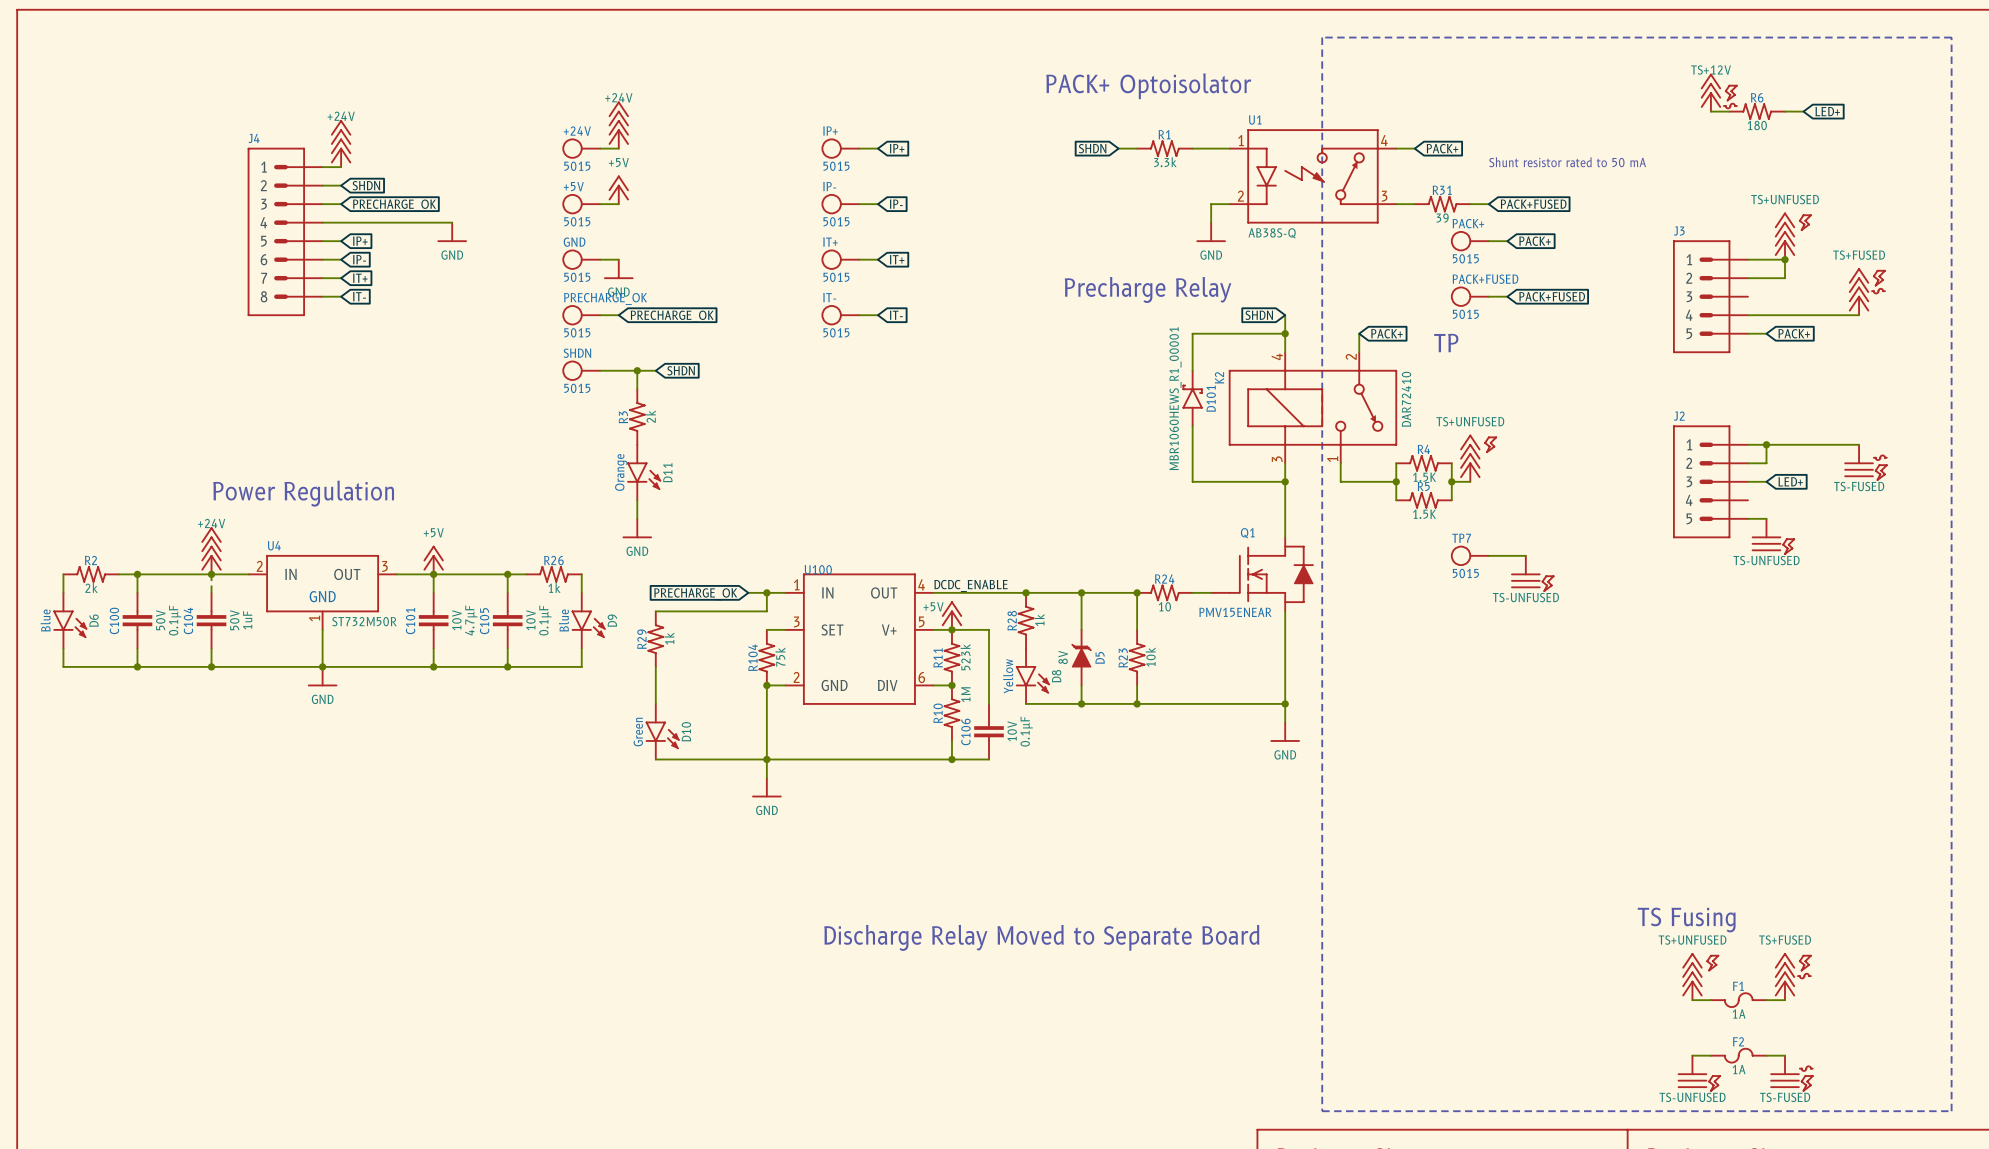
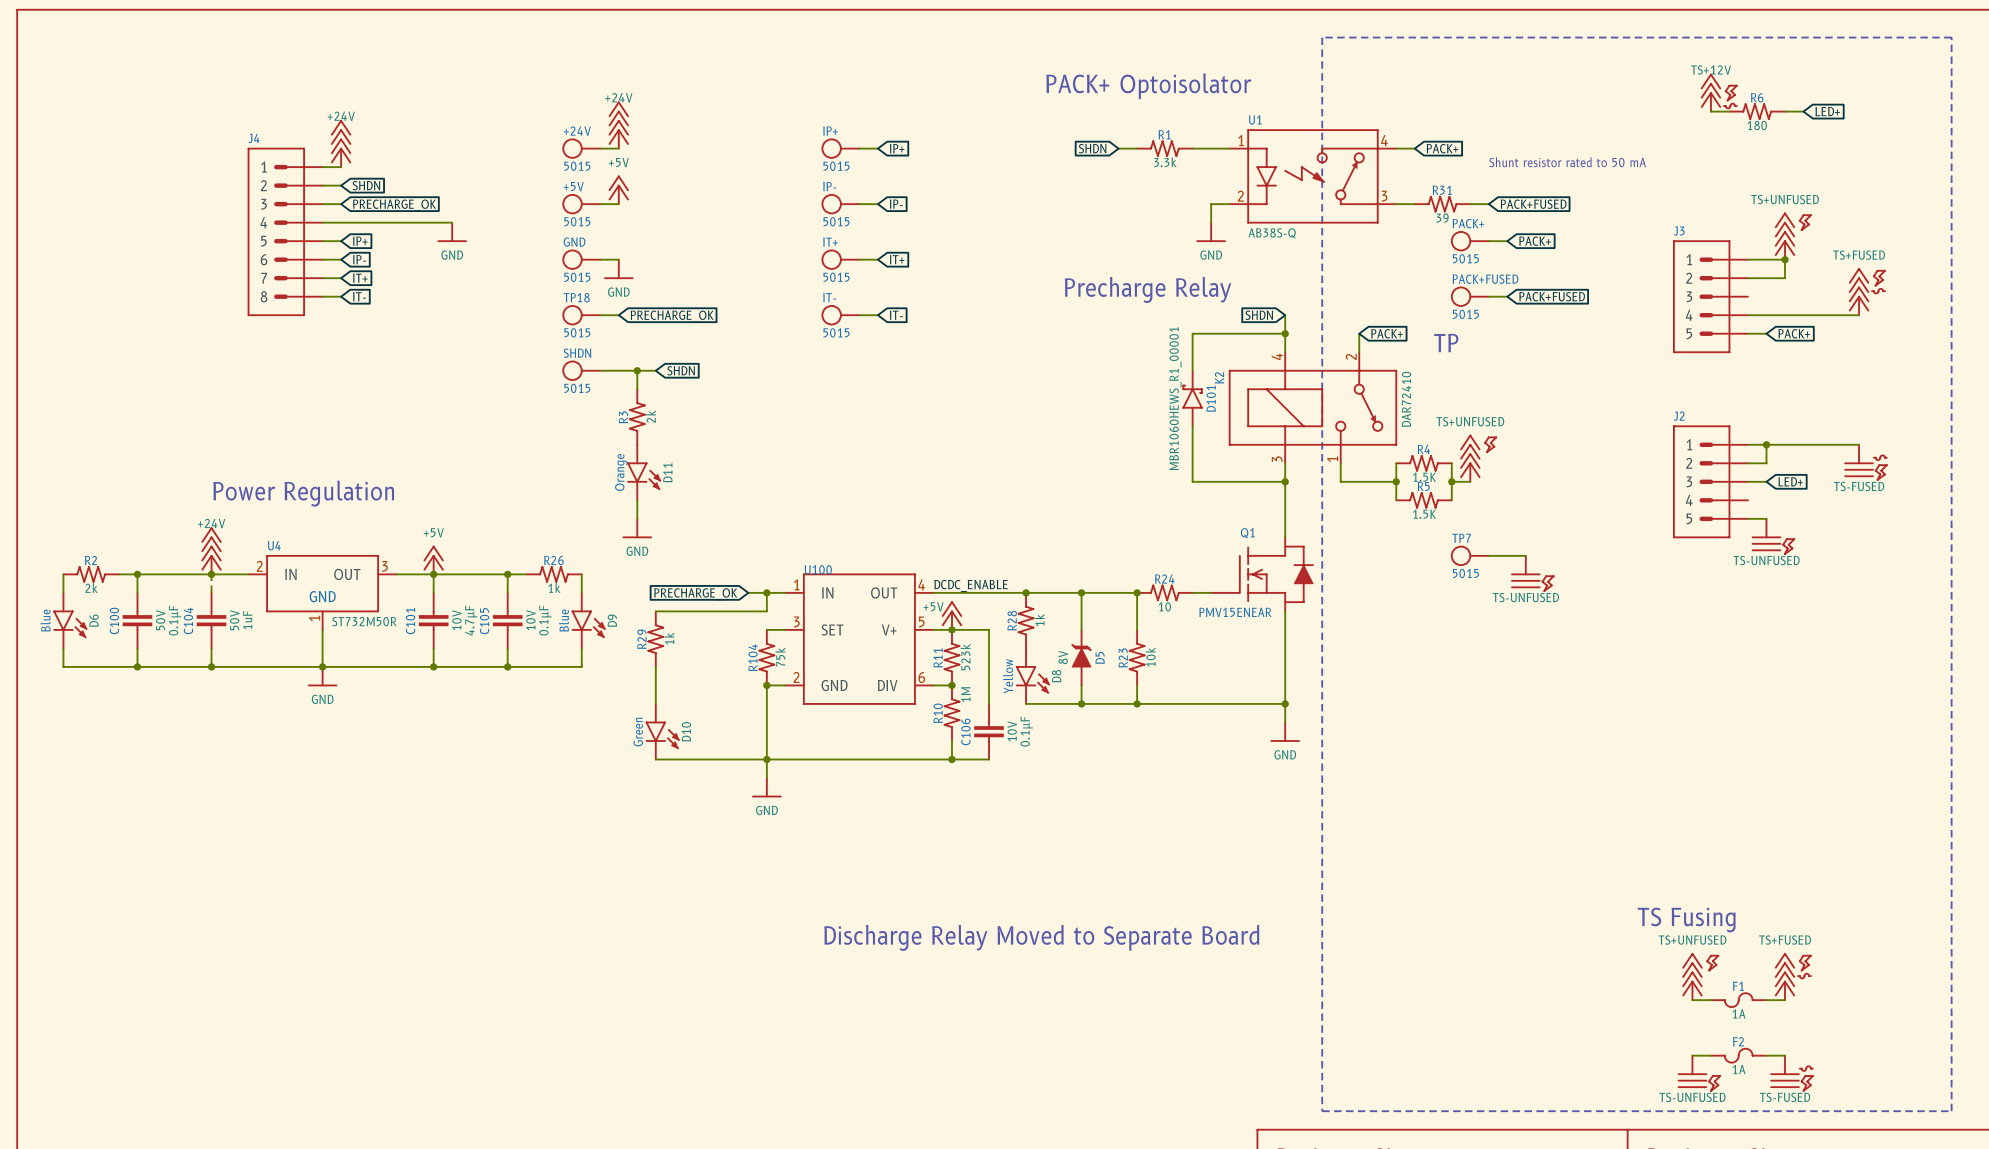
PRECHARGE_OK name: PRECHARGE_OK (605, 299) -> TP18 (576, 297)

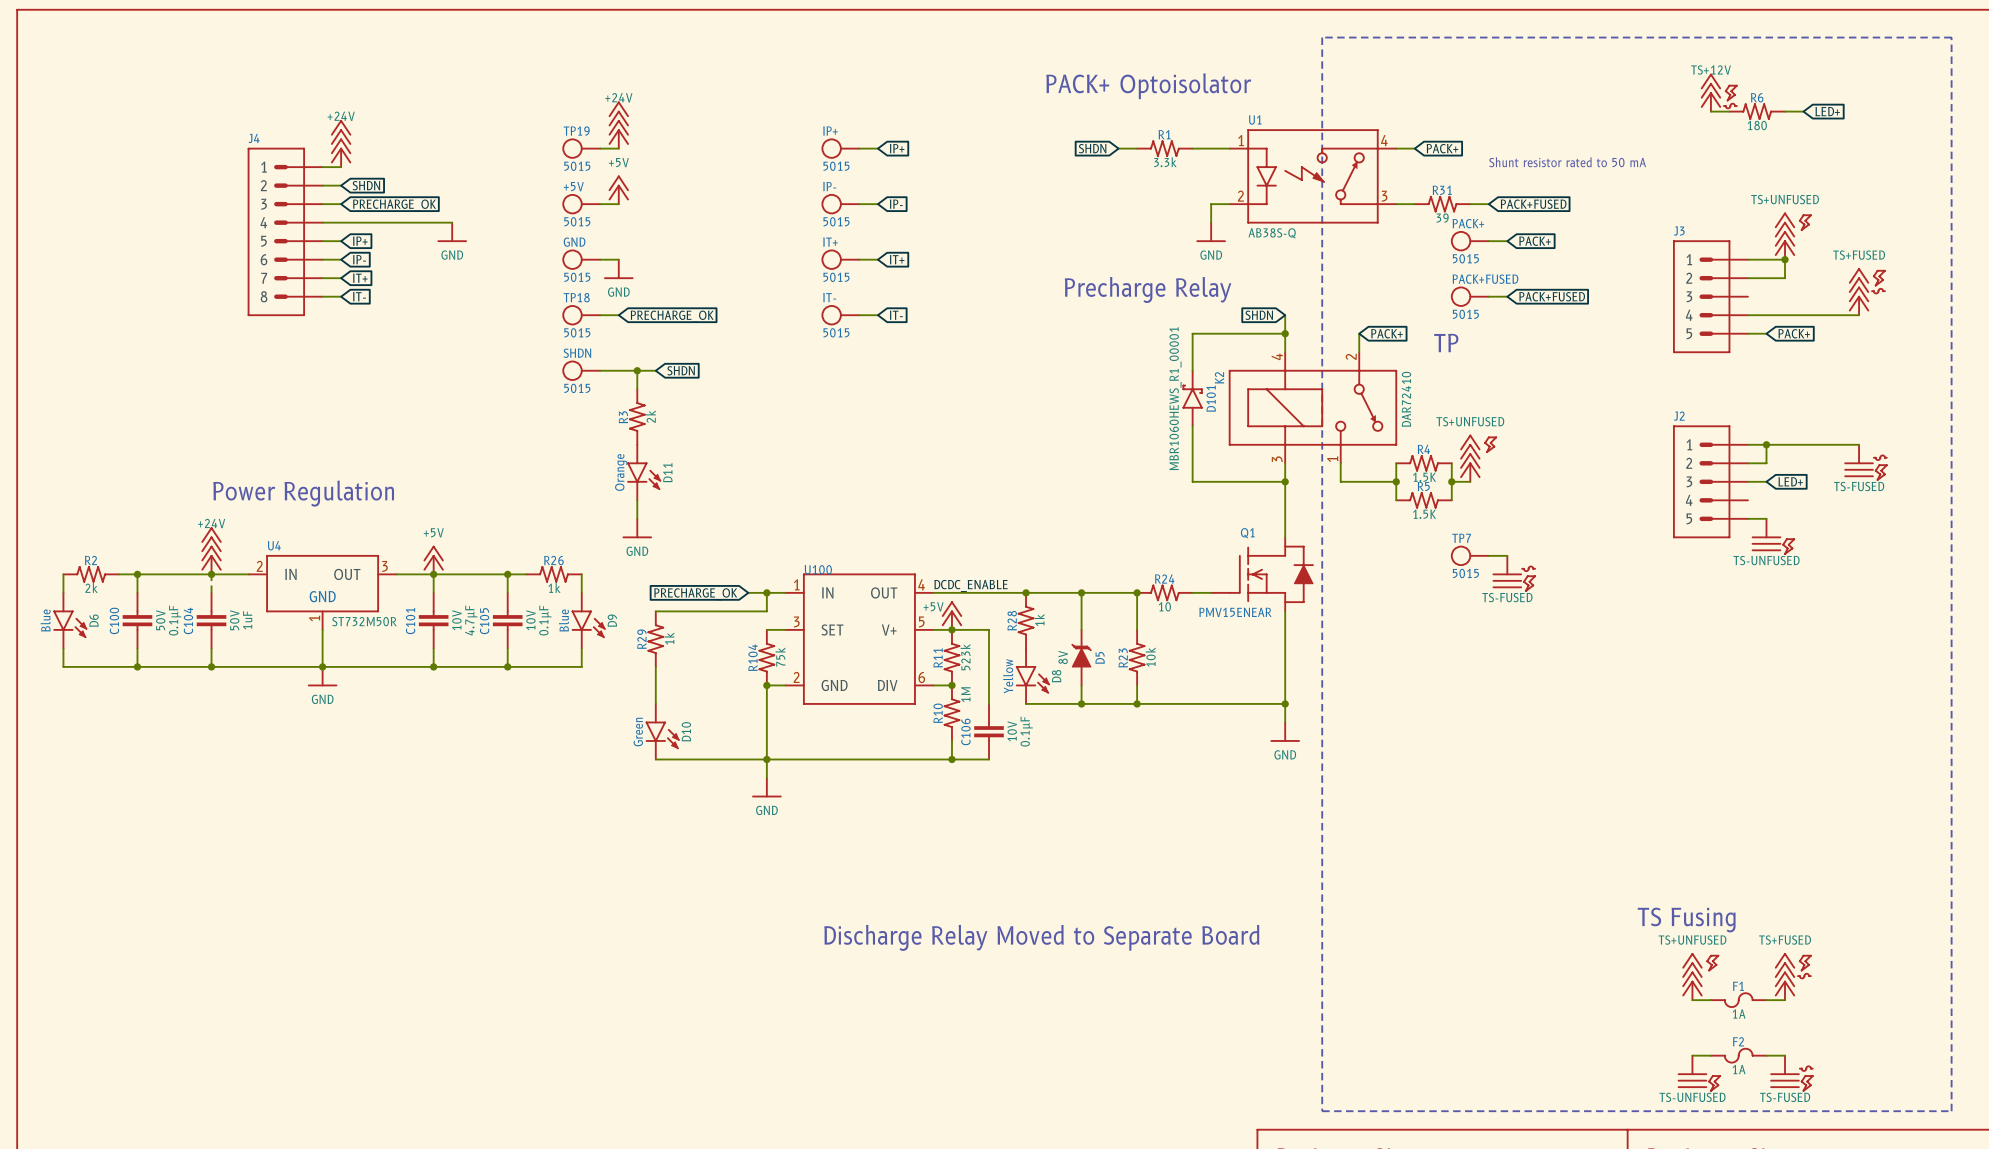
+24V name: +24V (577, 131) -> TP19 (576, 131)
wire: (1507, 555) (1525, 555) -> none
power symbol: none -> TS-FUSED (1514, 573)
power symbol: TS-UNFUSED (1532, 573) -> none

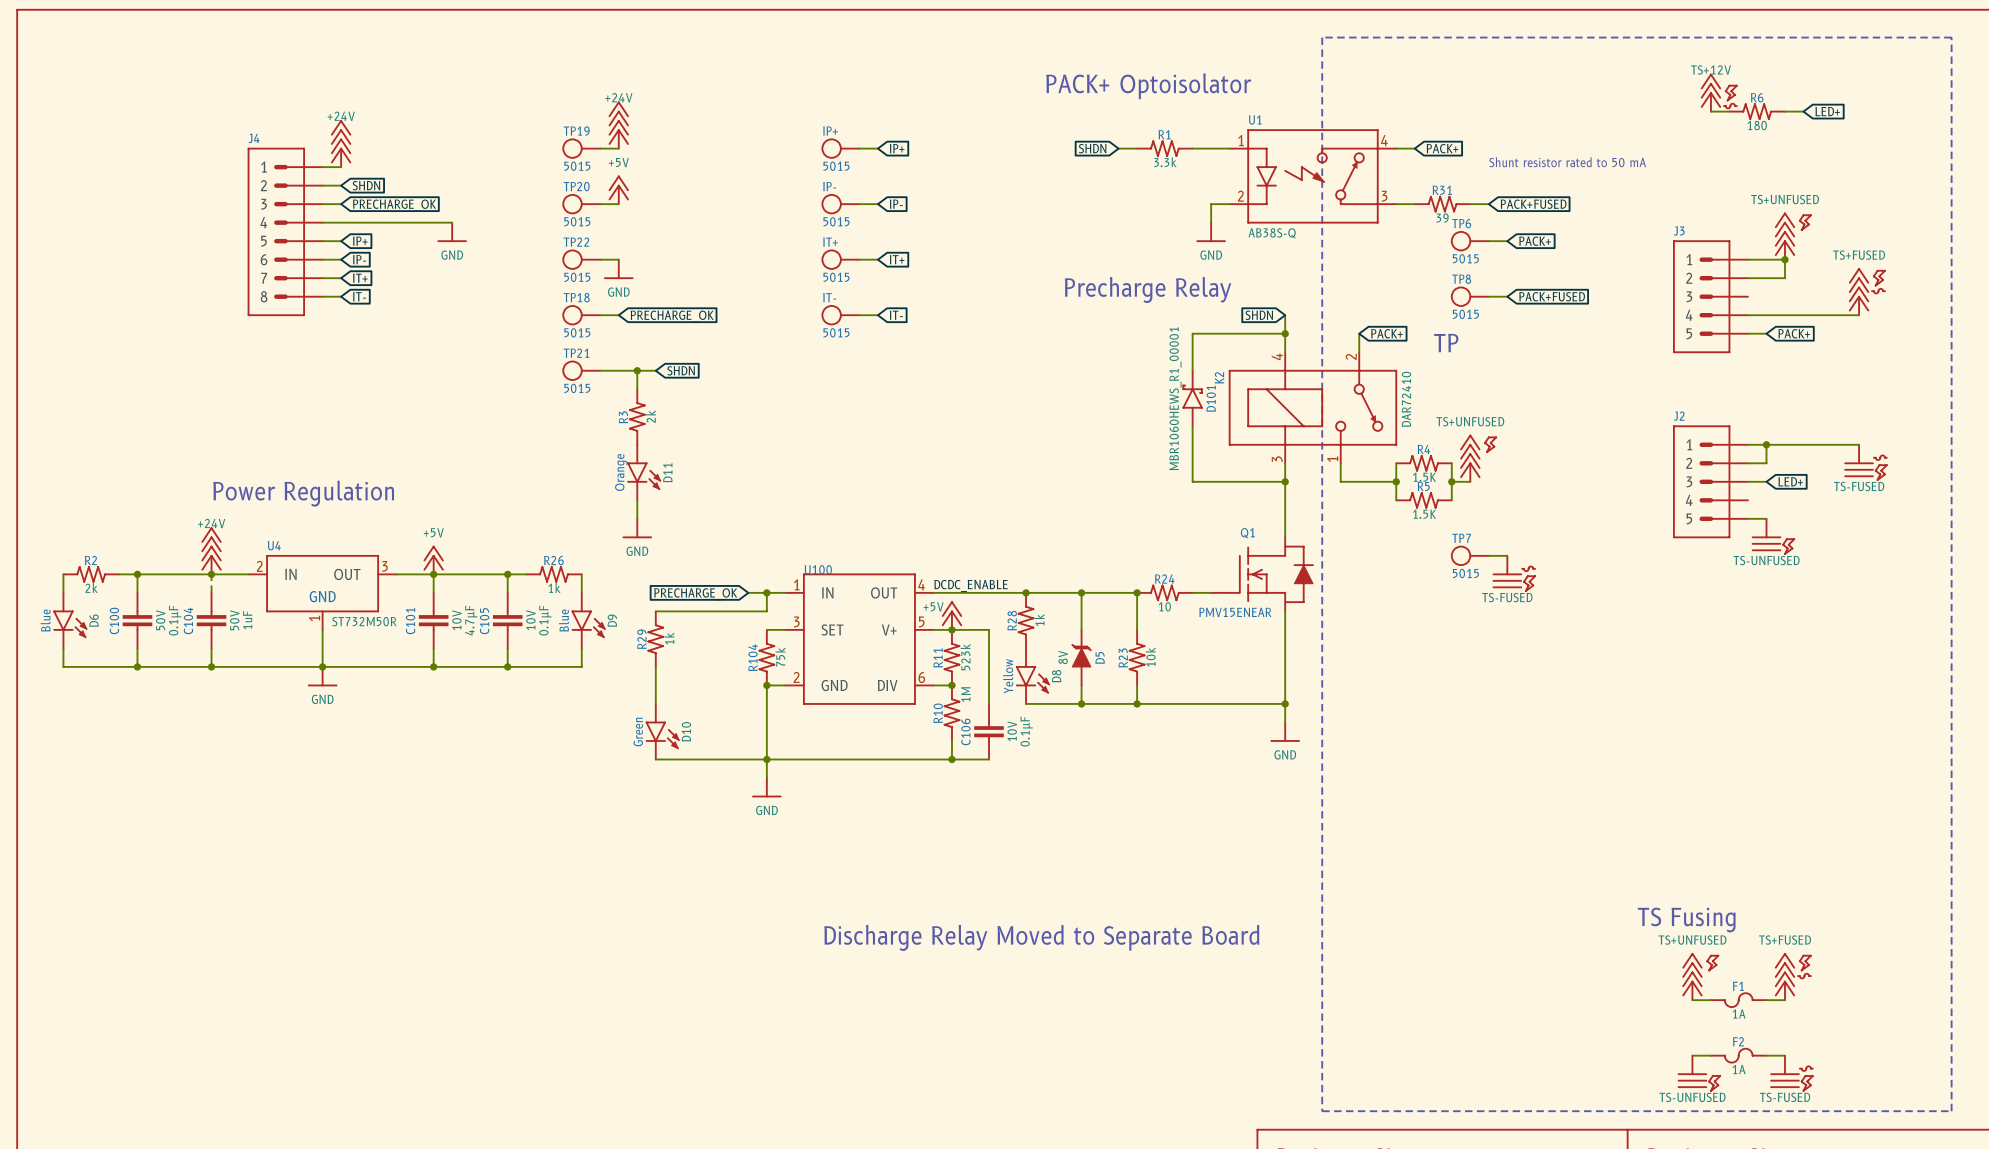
+5V name: +5V (573, 186) -> TP20 (576, 186)
PACK+ name: PACK+ (1468, 223) -> TP6 (1461, 223)
GND name: GND (574, 242) -> TP22 (576, 242)
PACK+FUSED name: PACK+FUSED (1485, 279) -> TP8 (1461, 279)
SHDN name: SHDN (577, 353) -> TP21 (576, 353)

